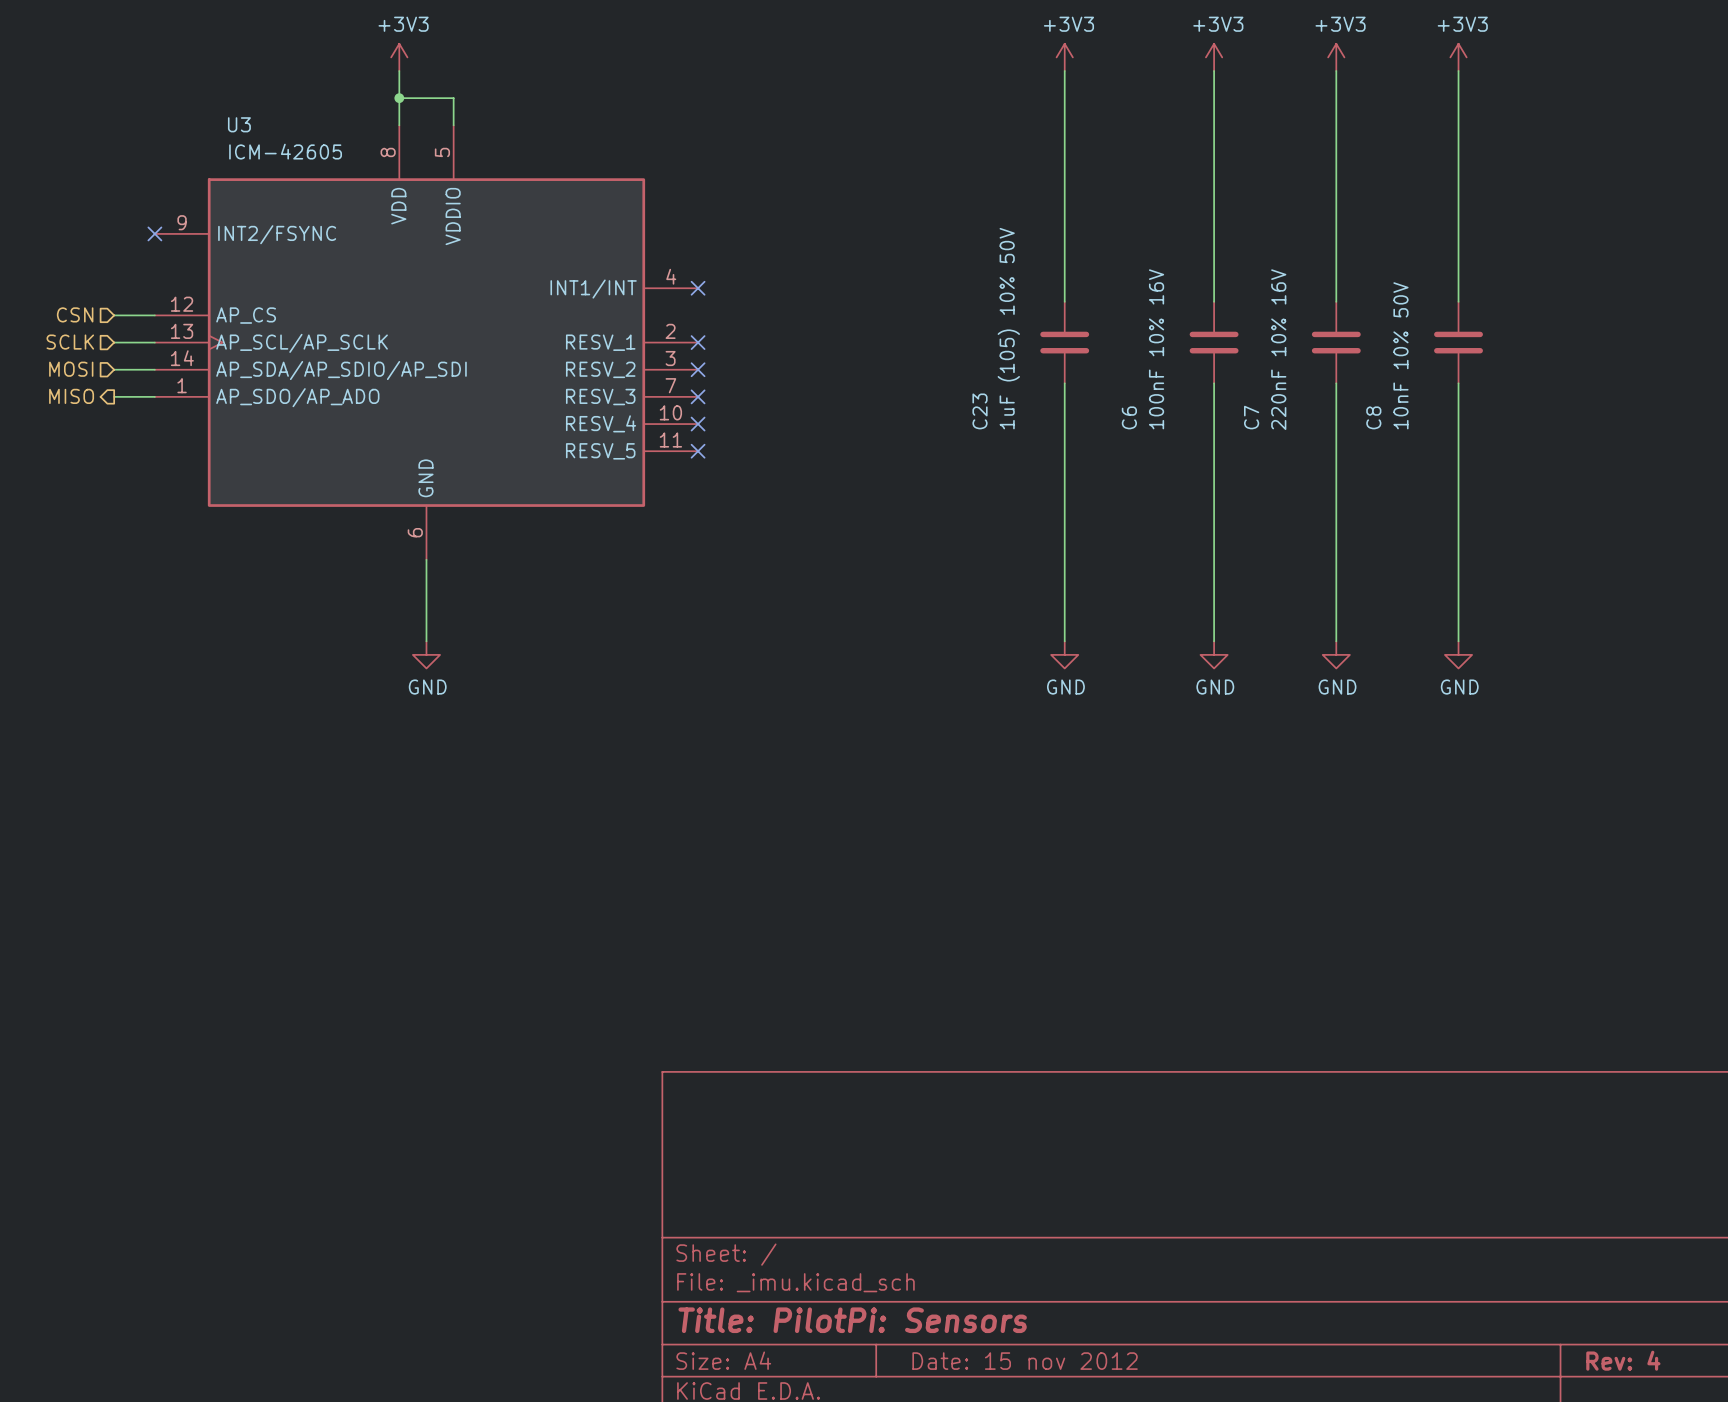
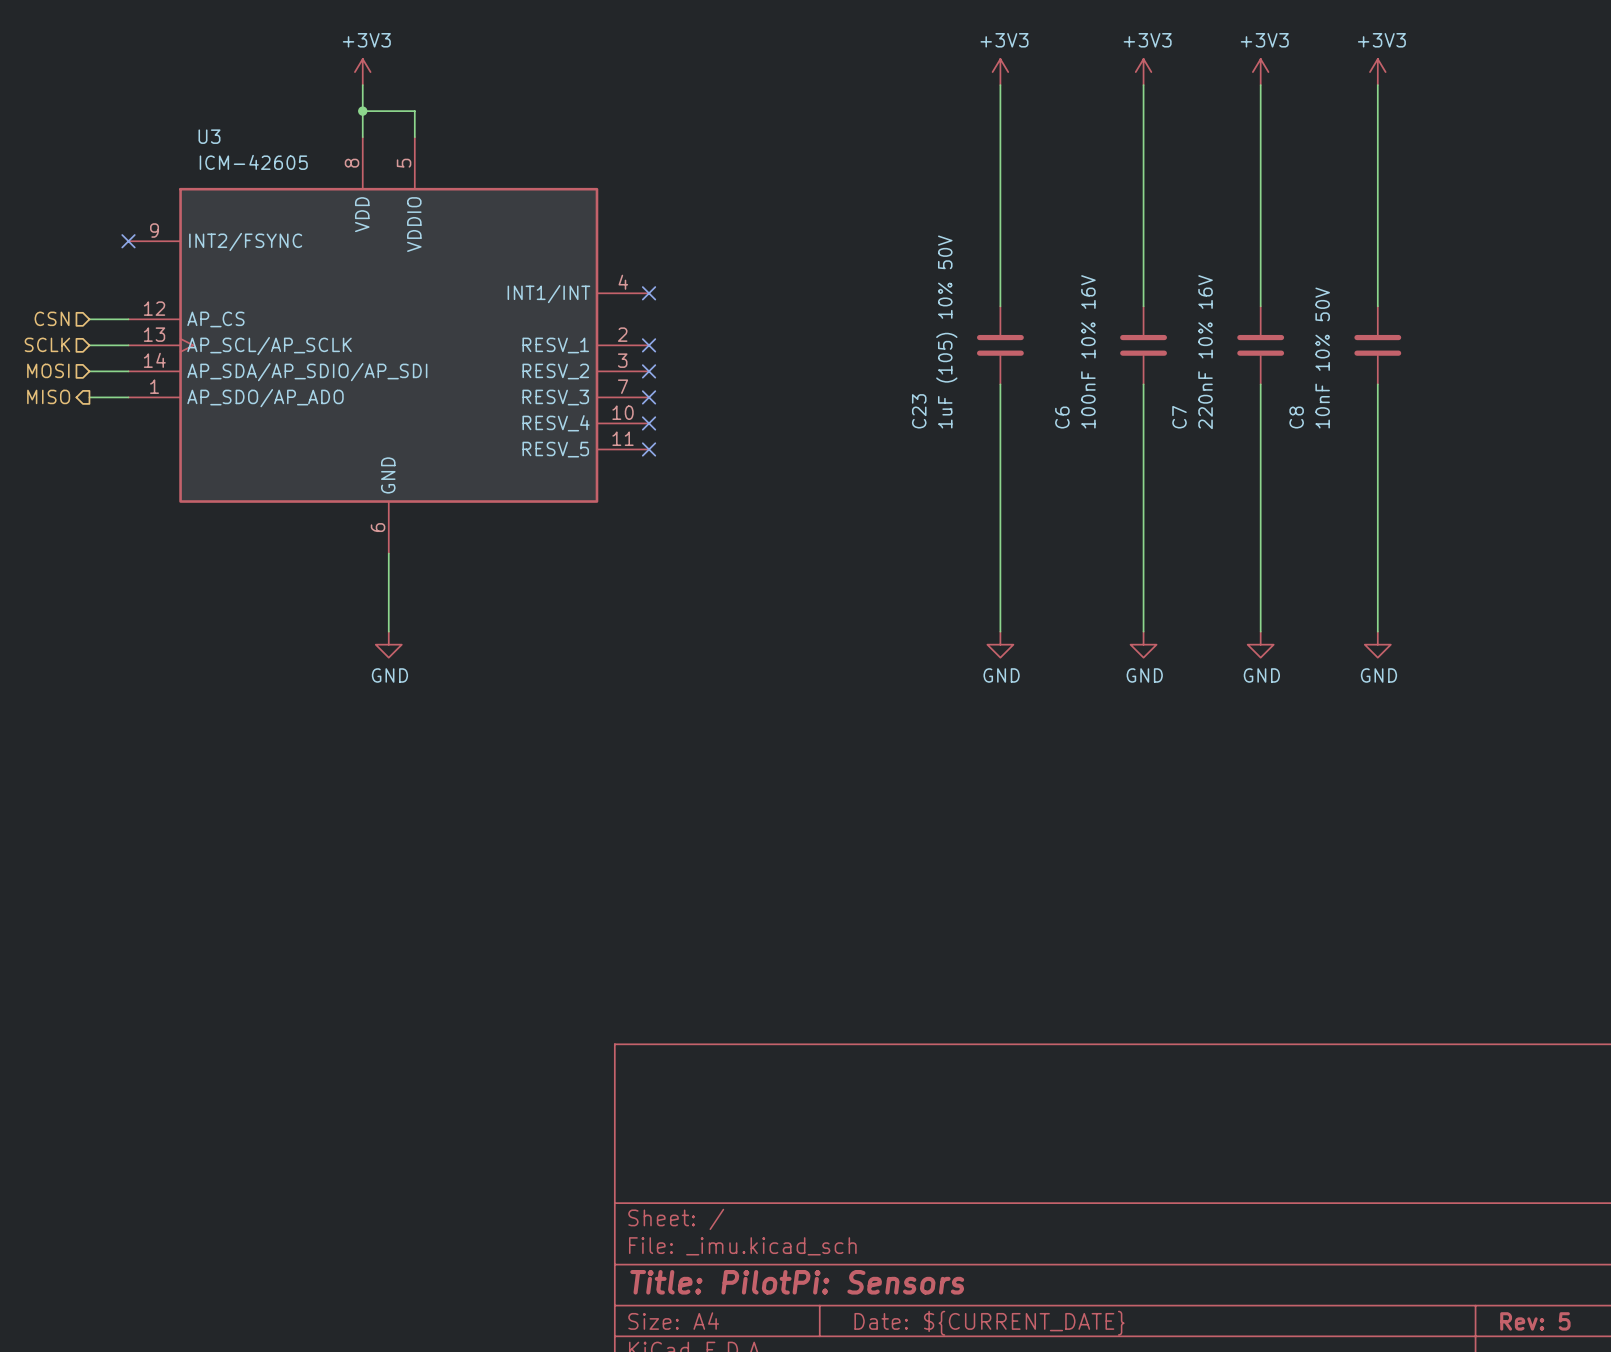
title block: Rev: 4 (1623, 1360) -> Rev: 5 (1535, 1321)
title block: Date: 15 nov 2012 (1025, 1361) -> Date: ${CURRENT_DATE} (989, 1323)

